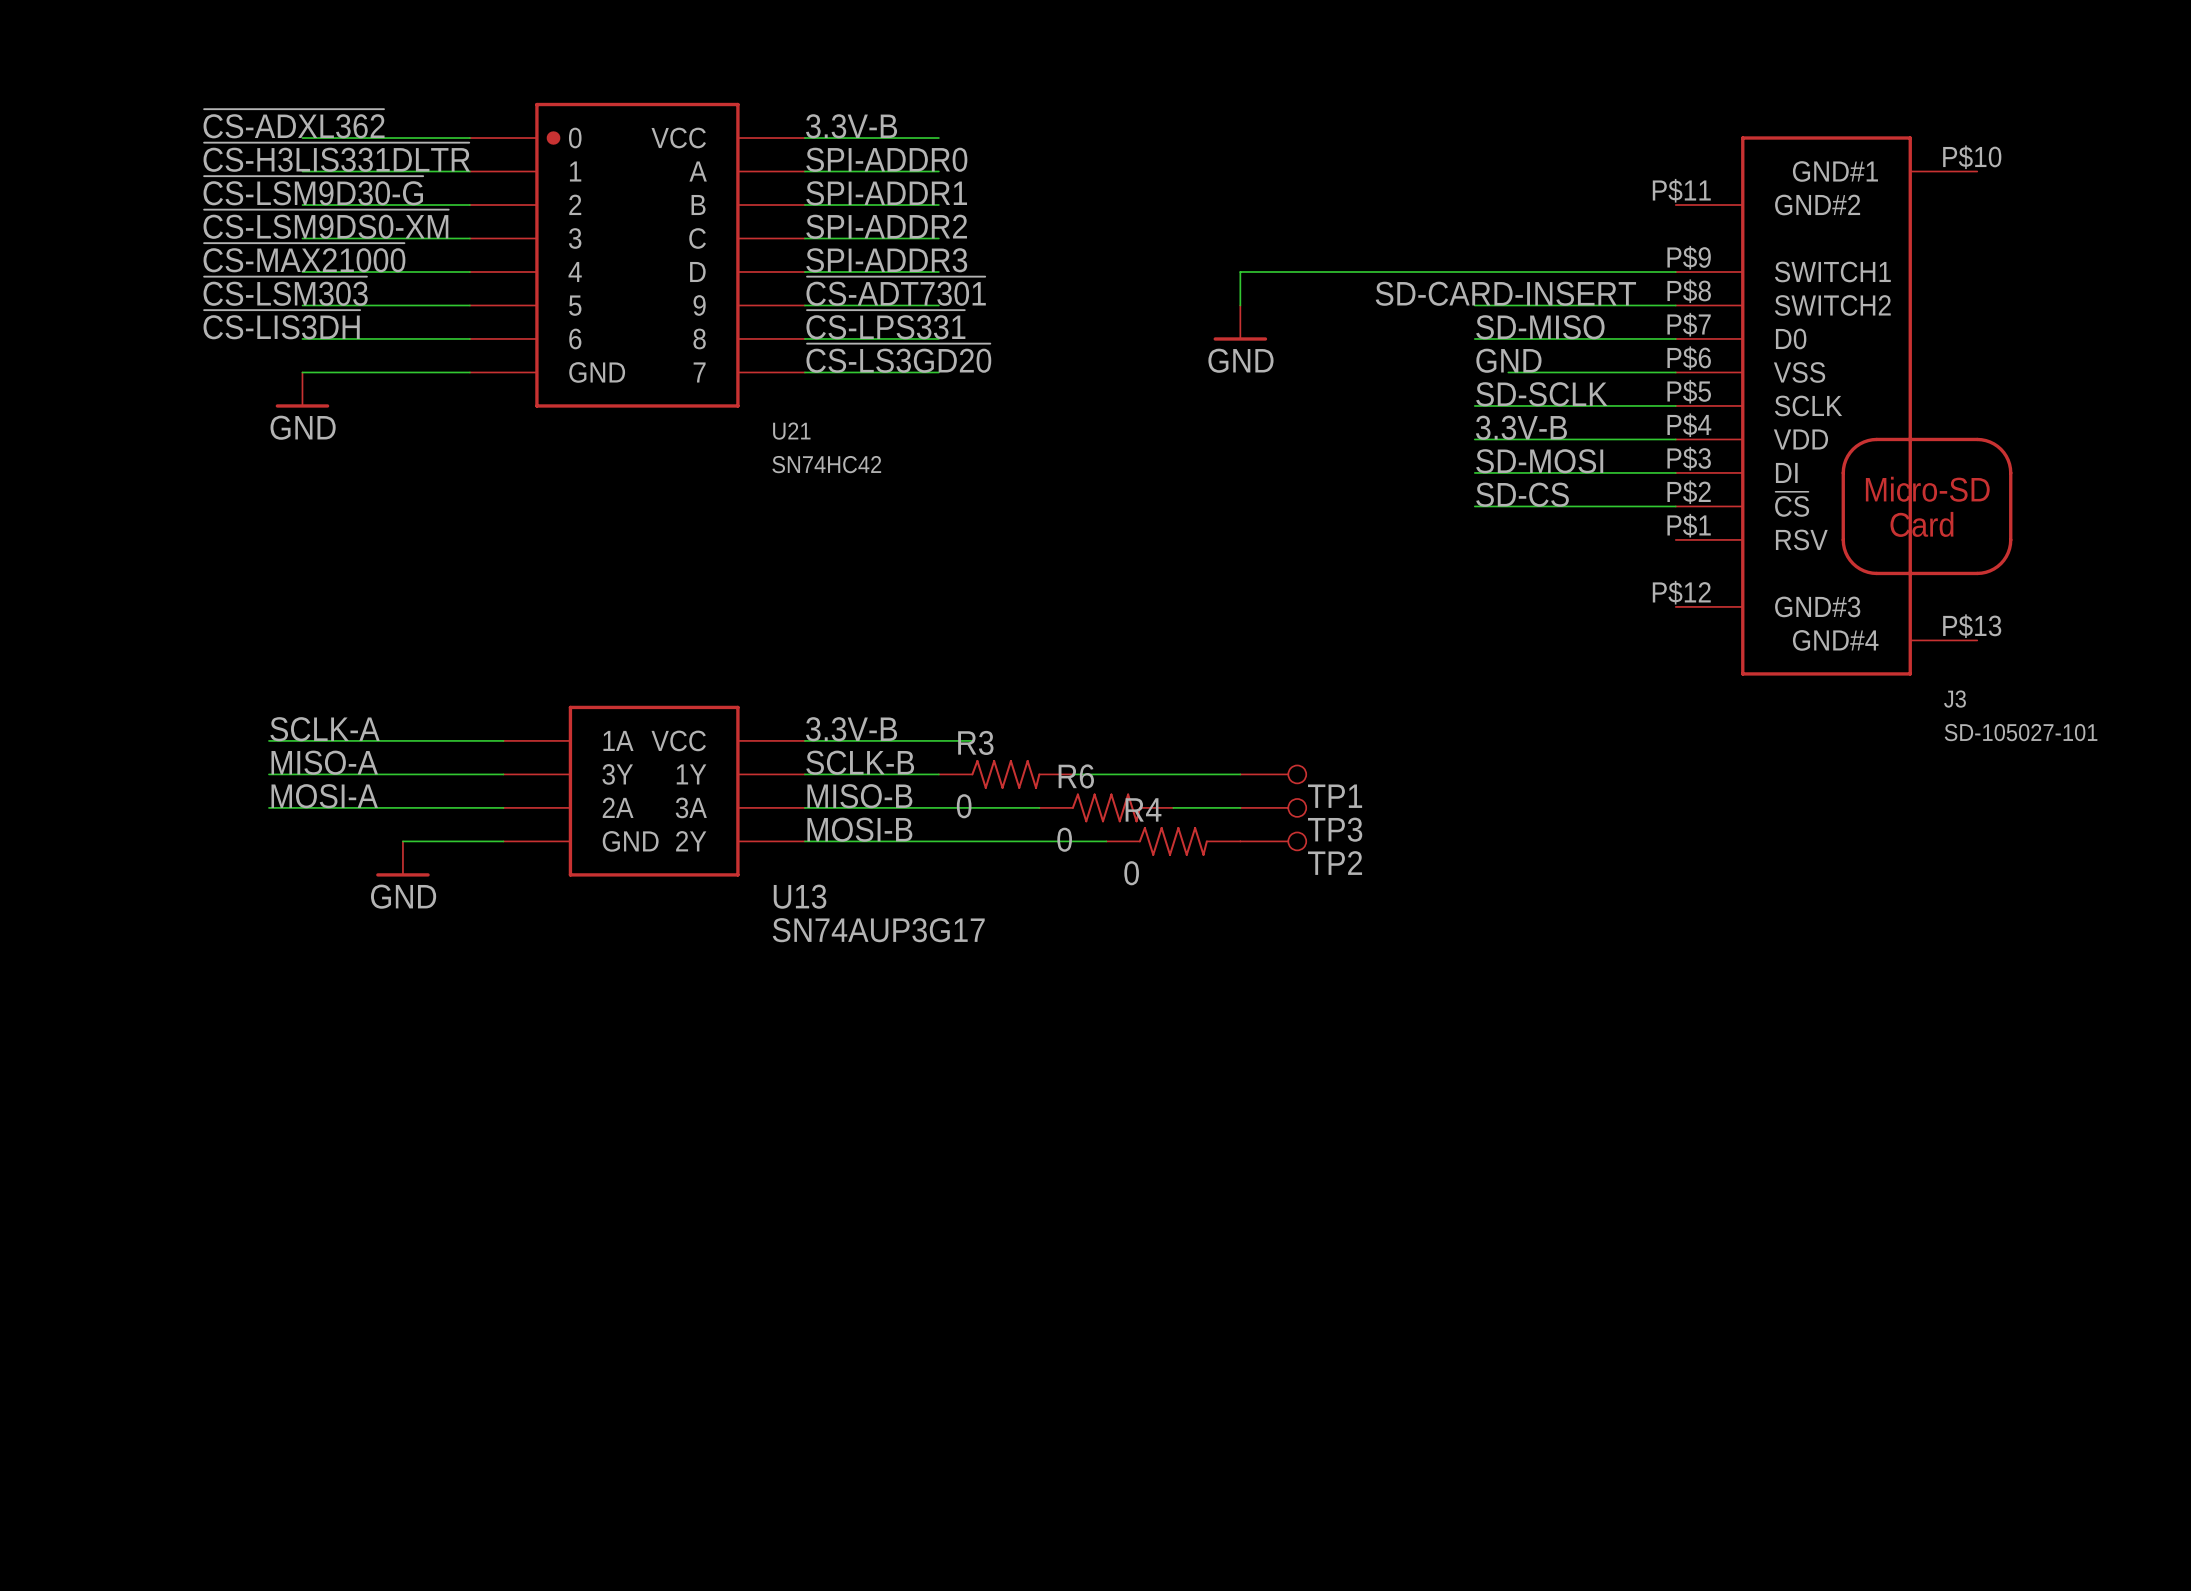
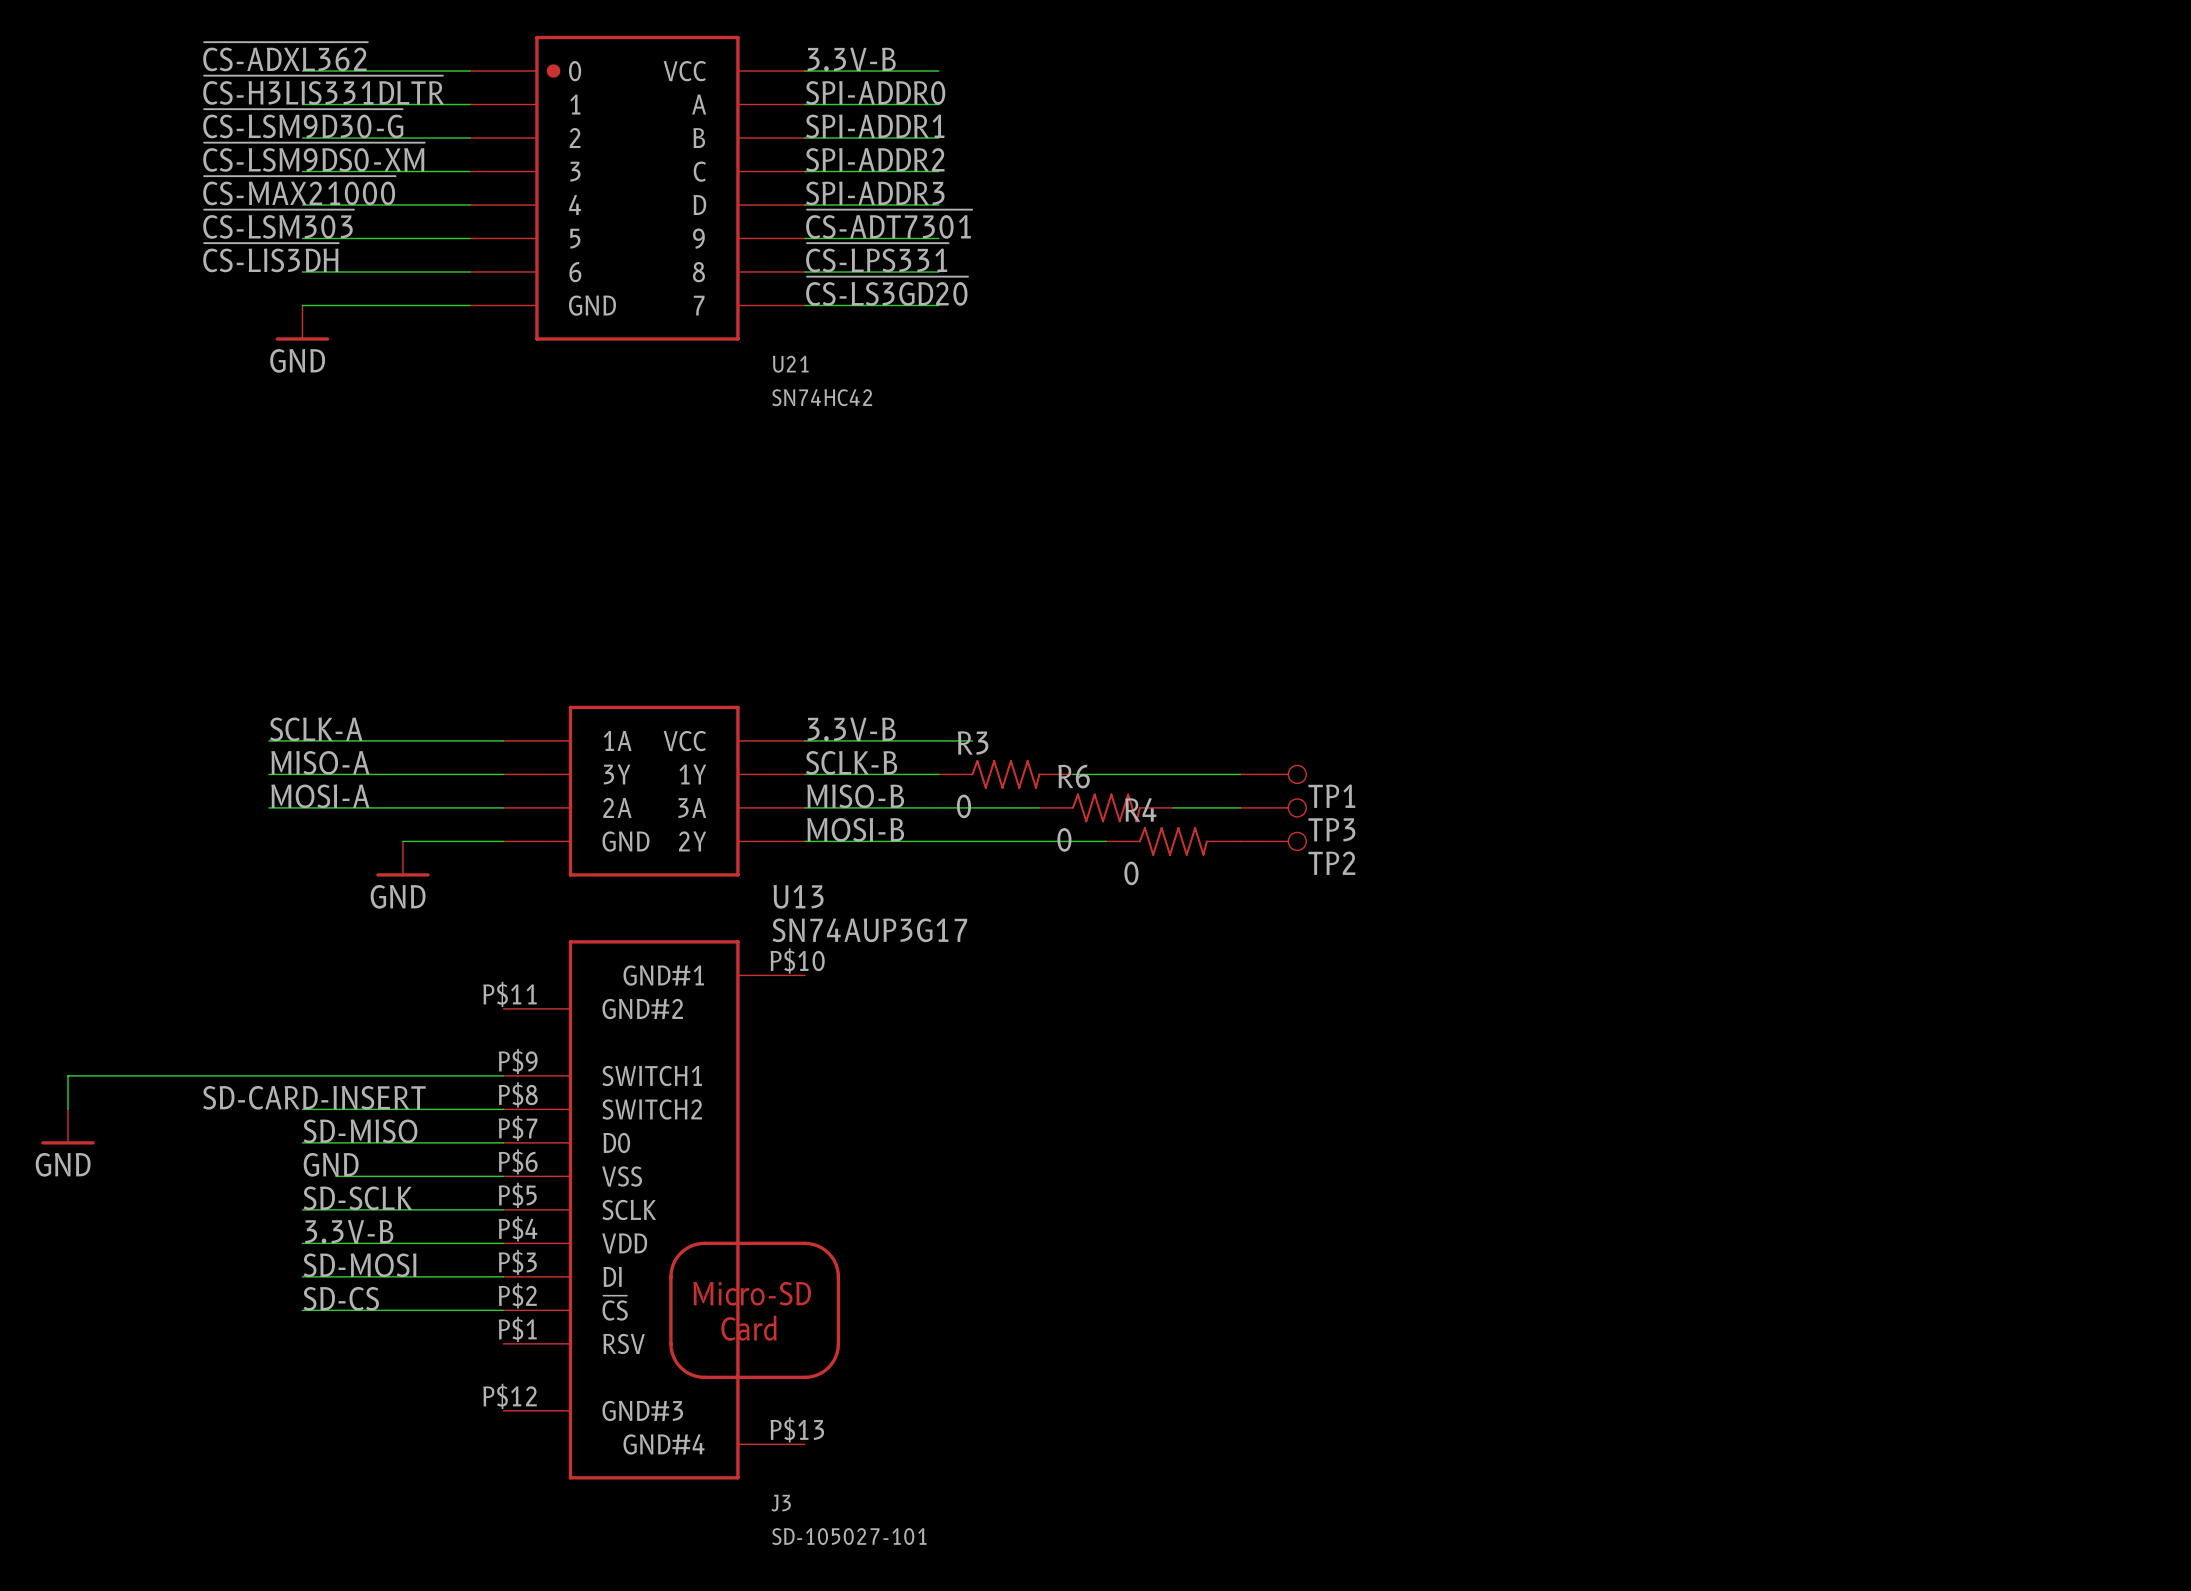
label: none -> ~{CS-ADXL362} (285, 56)
label: none -> 3.3V-B (851, 59)
label: none -> ~{CS-H3LIS331DLTR} (323, 90)
label: none -> SPI-ADDR0 (875, 92)
label: ~{CS-ADXL362} (294, 123) -> ~{CS-LSM9D30-G} (303, 123)
label: 3.3V-B (851, 126) -> SPI-ADDR1 (875, 126)
label: ~{CS-H3LIS331DLTR} (336, 157) -> ~{CS-LSM9DS0-XM} (314, 157)
label: SPI-ADDR0 (886, 159) -> SPI-ADDR2 (875, 159)
label: ~{CS-LSM9D30-G} (313, 190) -> ~{CS-MAX21000} (299, 190)
label: SPI-ADDR1 (886, 193) -> SPI-ADDR3 (875, 193)
label: ~{CS-LSM9DS0-XM} (326, 224) -> ~{CS-LSM303} (278, 224)
label: SPI-ADDR2 (886, 226) -> ~{CS-ADT7301} (889, 224)
U21 position: (637, 255) -> (637, 188)
label: ~{CS-MAX21000} (304, 257) -> ~{CS-LIS3DH} (270, 257)
label: SPI-ADDR3 (886, 260) -> ~{CS-LPS331} (877, 257)
wire: (1675, 271) (1240, 271) (1240, 305) -> none
label: ~{CS-LSM303} (285, 291) -> none
label: ~{CS-ADT7301} (896, 291) -> ~{CS-LS3GD20} (887, 291)
label: SD-CARD-INSERT (1505, 293) -> none
wire: (1474, 305) (1675, 305) -> none
power symbol: GND (1240, 323) -> none
label: ~{CS-LIS3DH} (281, 324) -> none
label: ~{CS-LPS331} (885, 324) -> none
label: SD-MISO (1540, 327) -> none
wire: (302, 338) (469, 338) -> (302, 71) (469, 71)
wire: (804, 338) (938, 338) -> (804, 71) (938, 71)
wire: (1474, 338) (1675, 338) -> none
label: ~{CS-LS3GD20} (898, 358) -> none
label: GND (1508, 360) -> none
wire: (302, 372) (469, 372) -> (302, 104) (469, 104)
wire: (804, 372) (938, 372) -> (804, 104) (938, 104)
wire: (1508, 372) (1675, 372) -> none
power symbol position: GND (302, 390) -> GND (302, 323)
label: SD-SCLK (1541, 394) -> none
wire: (1474, 405) (1675, 405) -> none
J3 position: (1844, 405) -> (671, 1209)
label: 3.3V-B (1521, 427) -> none
wire: (1474, 439) (1675, 439) -> none
label: SD-MOSI (1539, 461) -> none
wire: (1474, 472) (1675, 472) -> none
label: SD-CS (1522, 494) -> none
wire: (1474, 506) (1675, 506) -> none
wire: none -> (503, 1075) (68, 1075) (68, 1109)
label: none -> SD-CARD-INSERT (314, 1097)
wire: none -> (302, 1109) (503, 1109)
power symbol: none -> GND (68, 1126)
label: none -> SD-MISO (360, 1131)
wire: none -> (302, 1142) (503, 1142)
label: none -> GND (331, 1164)
wire: none -> (335, 1176) (503, 1176)
label: none -> SD-SCLK (357, 1198)
wire: none -> (302, 1209) (503, 1209)
label: none -> 3.3V-B (349, 1231)
wire: none -> (302, 1243) (503, 1243)
label: none -> SD-MOSI (359, 1265)
wire: none -> (302, 1276) (503, 1276)
label: none -> SD-CS (341, 1298)
wire: none -> (302, 1310) (503, 1310)

